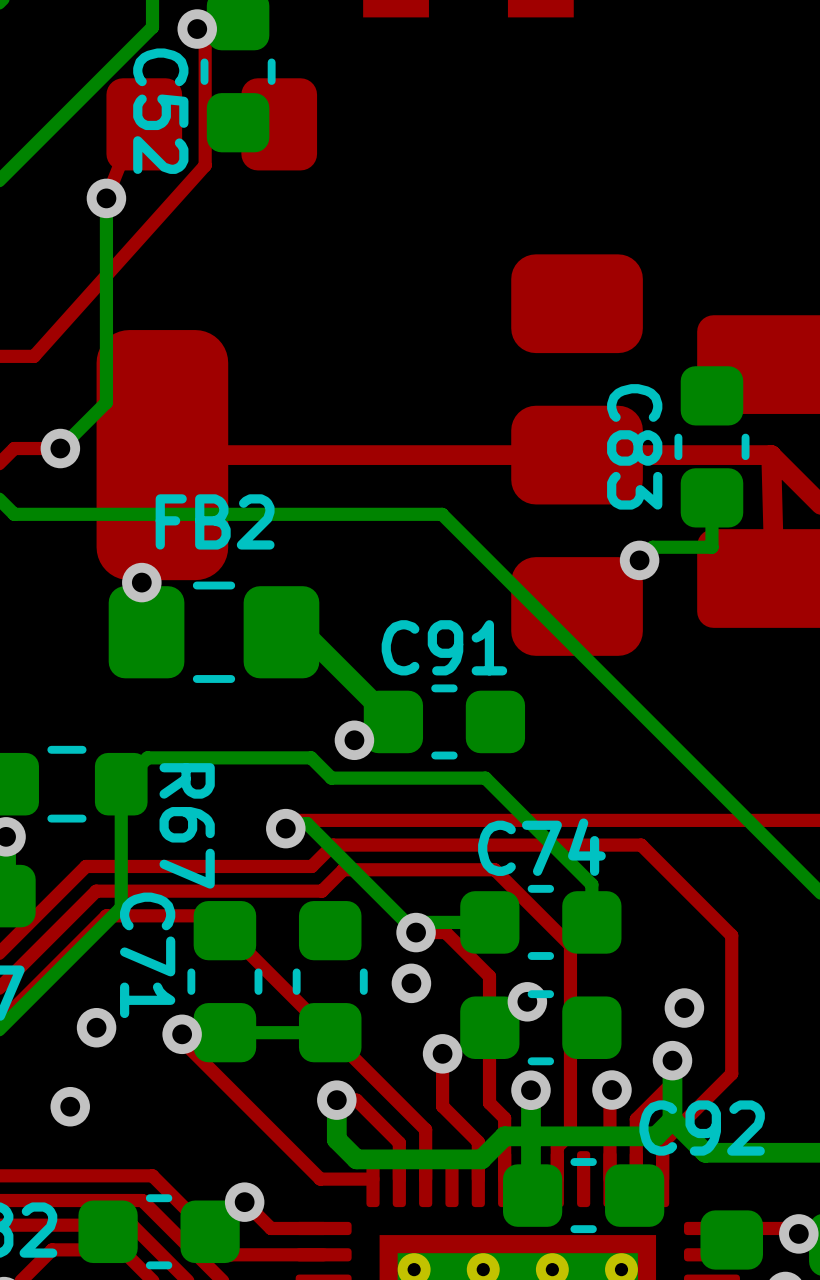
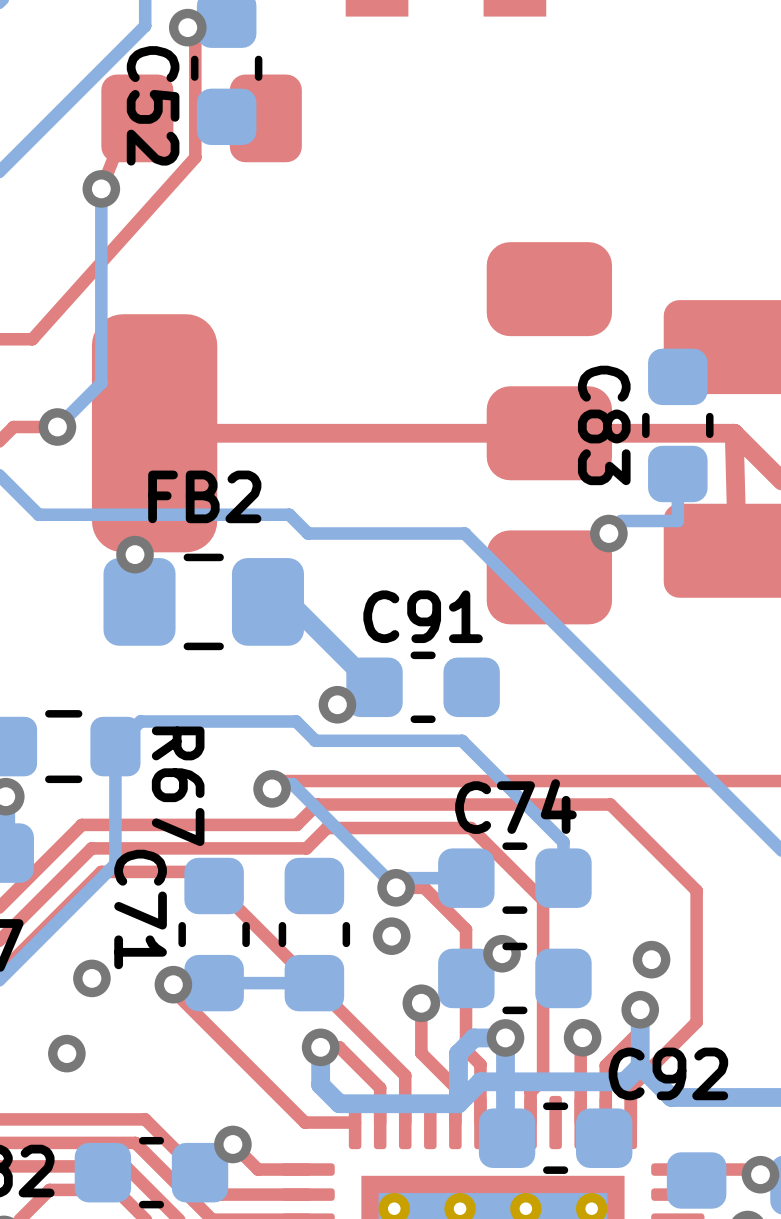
bottom track: (14, 514) (442, 514) (488, 560) -> (13, 489) (38, 514) (289, 514) (308, 533) (464, 533)
bottom track: none -> (505, 1037) (474, 1037) (458, 1053) (458, 1103)

